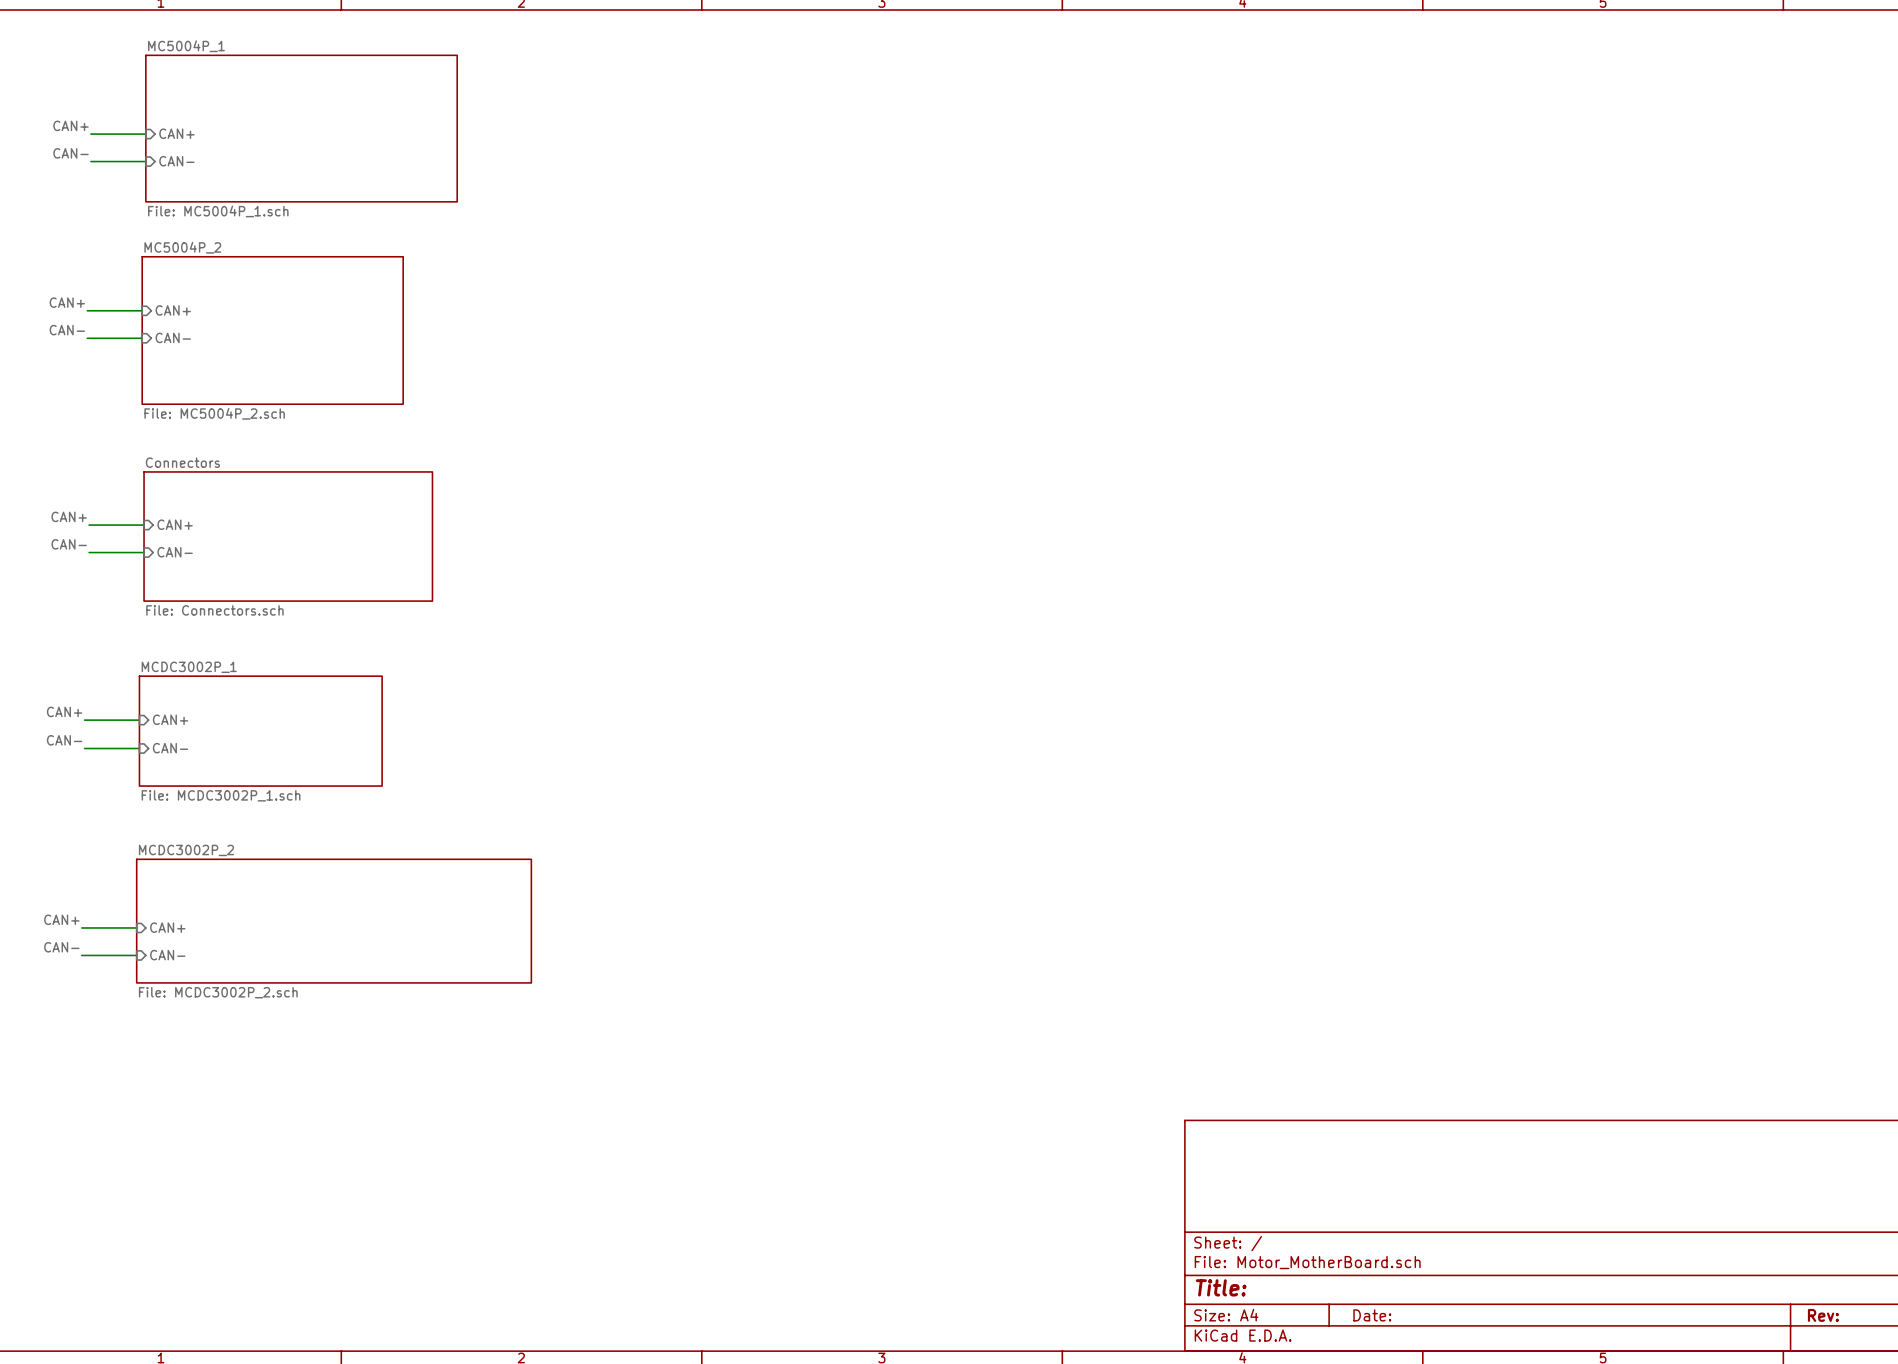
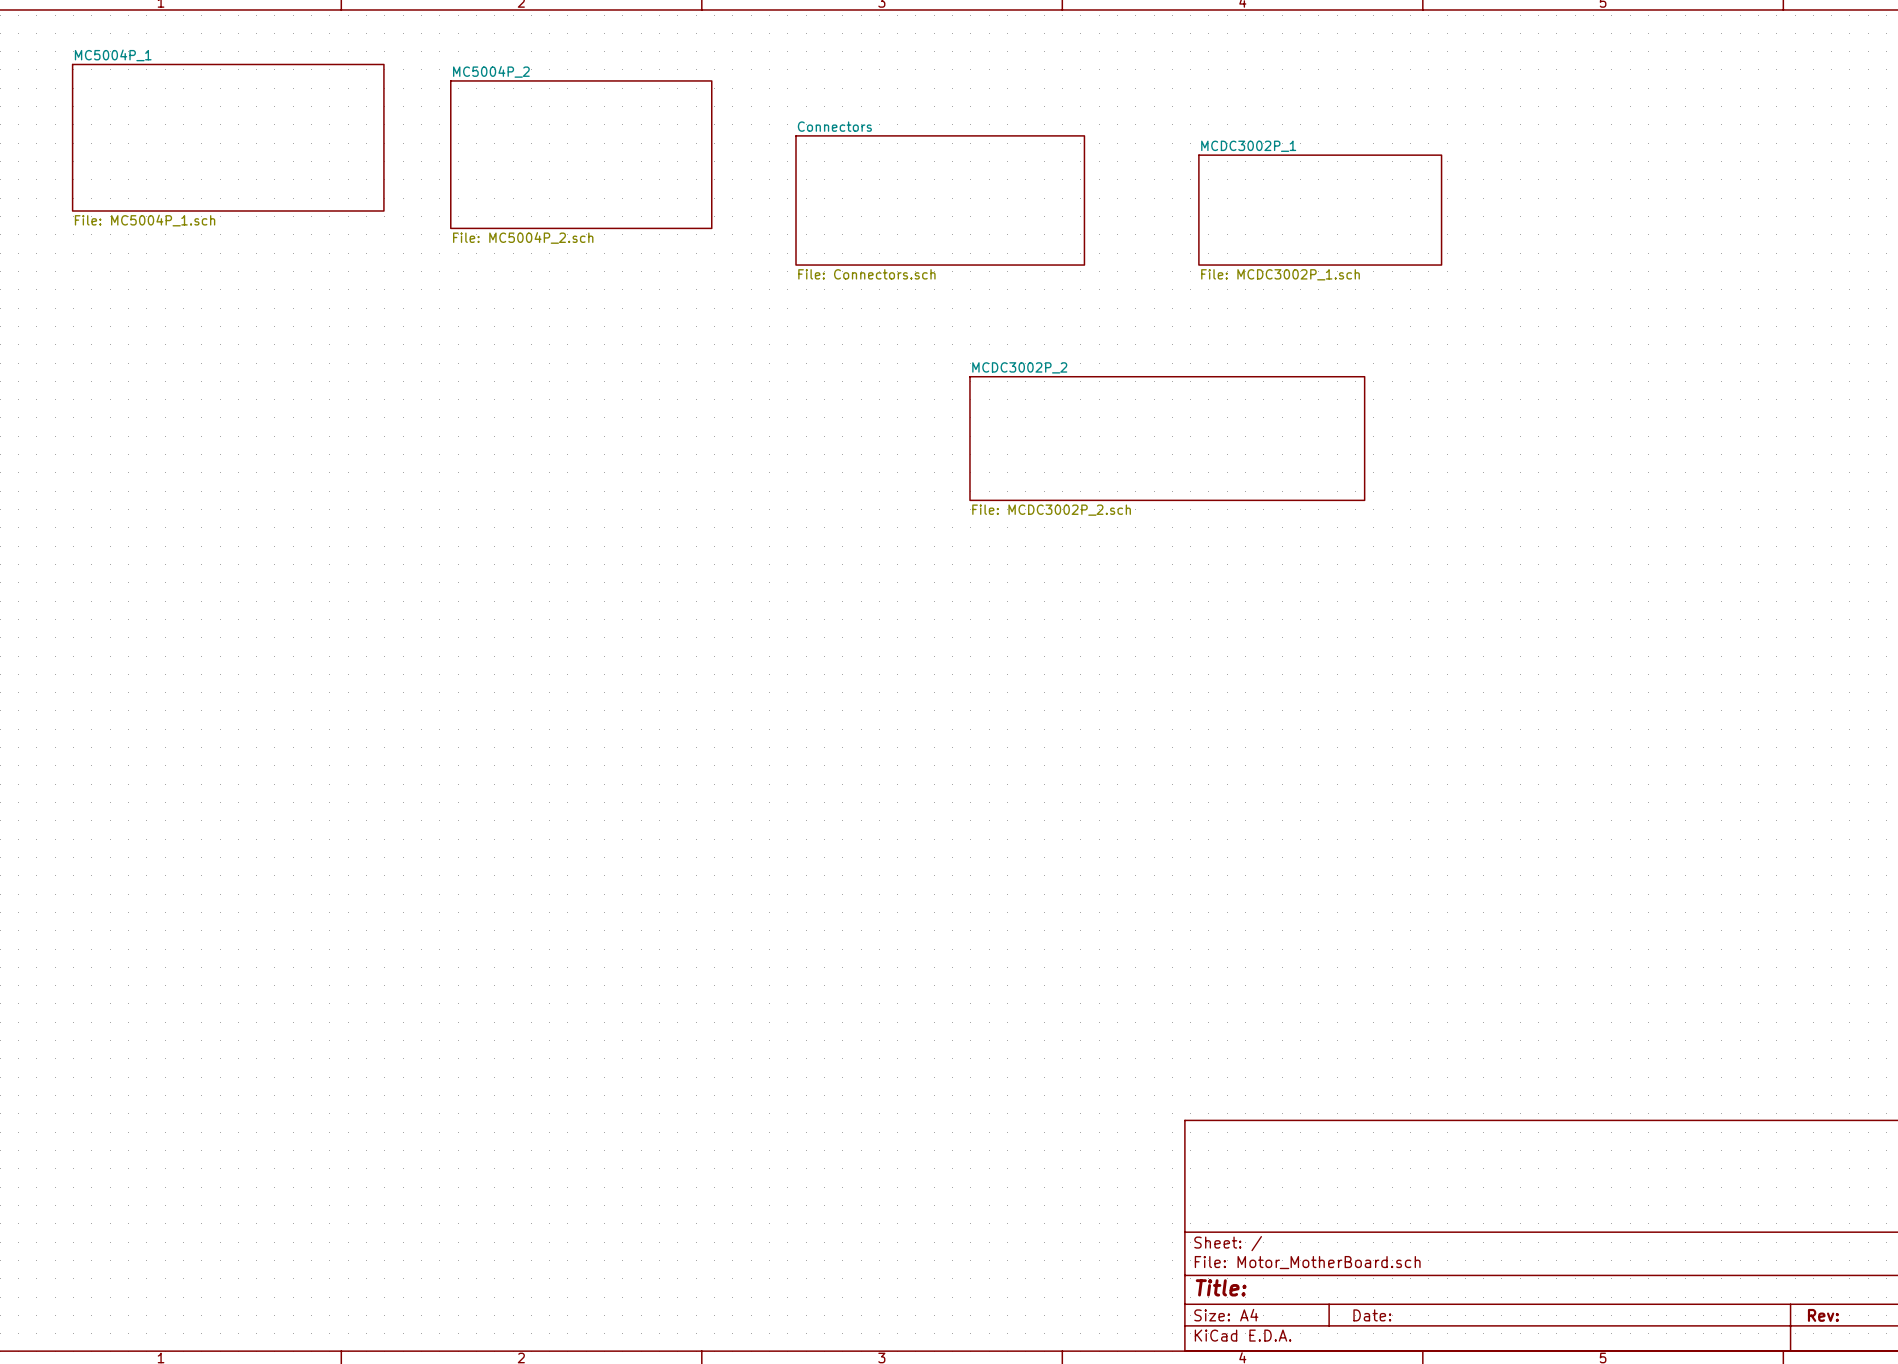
label: CAN+ (71, 125) -> none
sheet MC5004P_1 position: (301, 128) -> (228, 137)
sheet pin: CAN+ (176, 133) -> none
wire: (90, 134) (145, 134) -> none
label: CAN- (71, 153) -> none
wire: (90, 161) (145, 161) -> none
sheet pin: CAN- (176, 161) -> none
sheet Connectors: none -> File: Connectors.sch (940, 200)
label: CAN+ (67, 302) -> none
wire: (87, 310) (142, 310) -> none
sheet pin: CAN+ (173, 310) -> none
label: CAN- (67, 330) -> none
sheet MC5004P_2 position: (272, 330) -> (581, 154)
sheet pin: CAN- (173, 337) -> none
wire: (87, 338) (142, 338) -> none
label: CAN+ (69, 516) -> none
sheet pin: CAN+ (175, 524) -> none
wire: (89, 525) (144, 525) -> none
sheet Connectors: File: Connectors.sch (288, 536) -> none
label: CAN- (69, 544) -> none
wire: (89, 552) (144, 552) -> none
sheet pin: CAN- (175, 552) -> none
label: CAN+ (64, 711) -> none
sheet pin: CAN+ (170, 719) -> none
wire: (84, 720) (139, 720) -> none
sheet MCDC3002P_1 position: (260, 731) -> (1320, 210)
label: CAN- (64, 740) -> none
wire: (84, 748) (139, 748) -> none
sheet pin: CAN- (170, 748) -> none
label: CAN+ (61, 919) -> none
sheet MCDC3002P_2 position: (334, 921) -> (1167, 438)
wire: (81, 927) (136, 927) -> none
sheet pin: CAN+ (167, 927) -> none
label: CAN- (61, 947) -> none
wire: (81, 955) (136, 955) -> none
sheet pin: CAN- (167, 955) -> none

